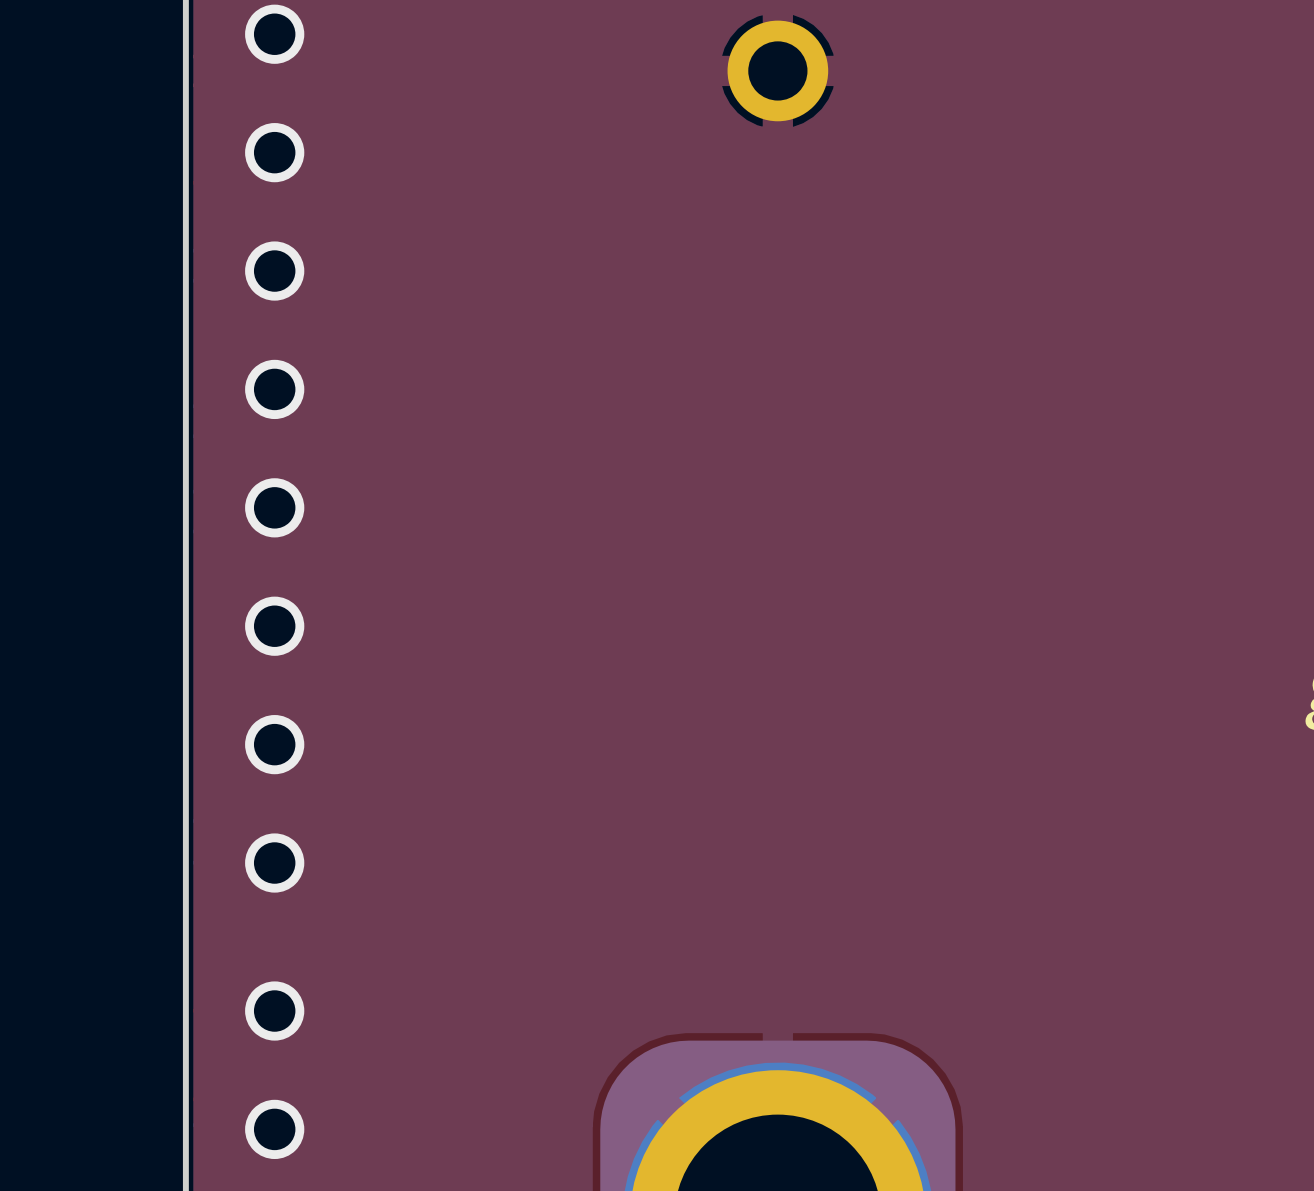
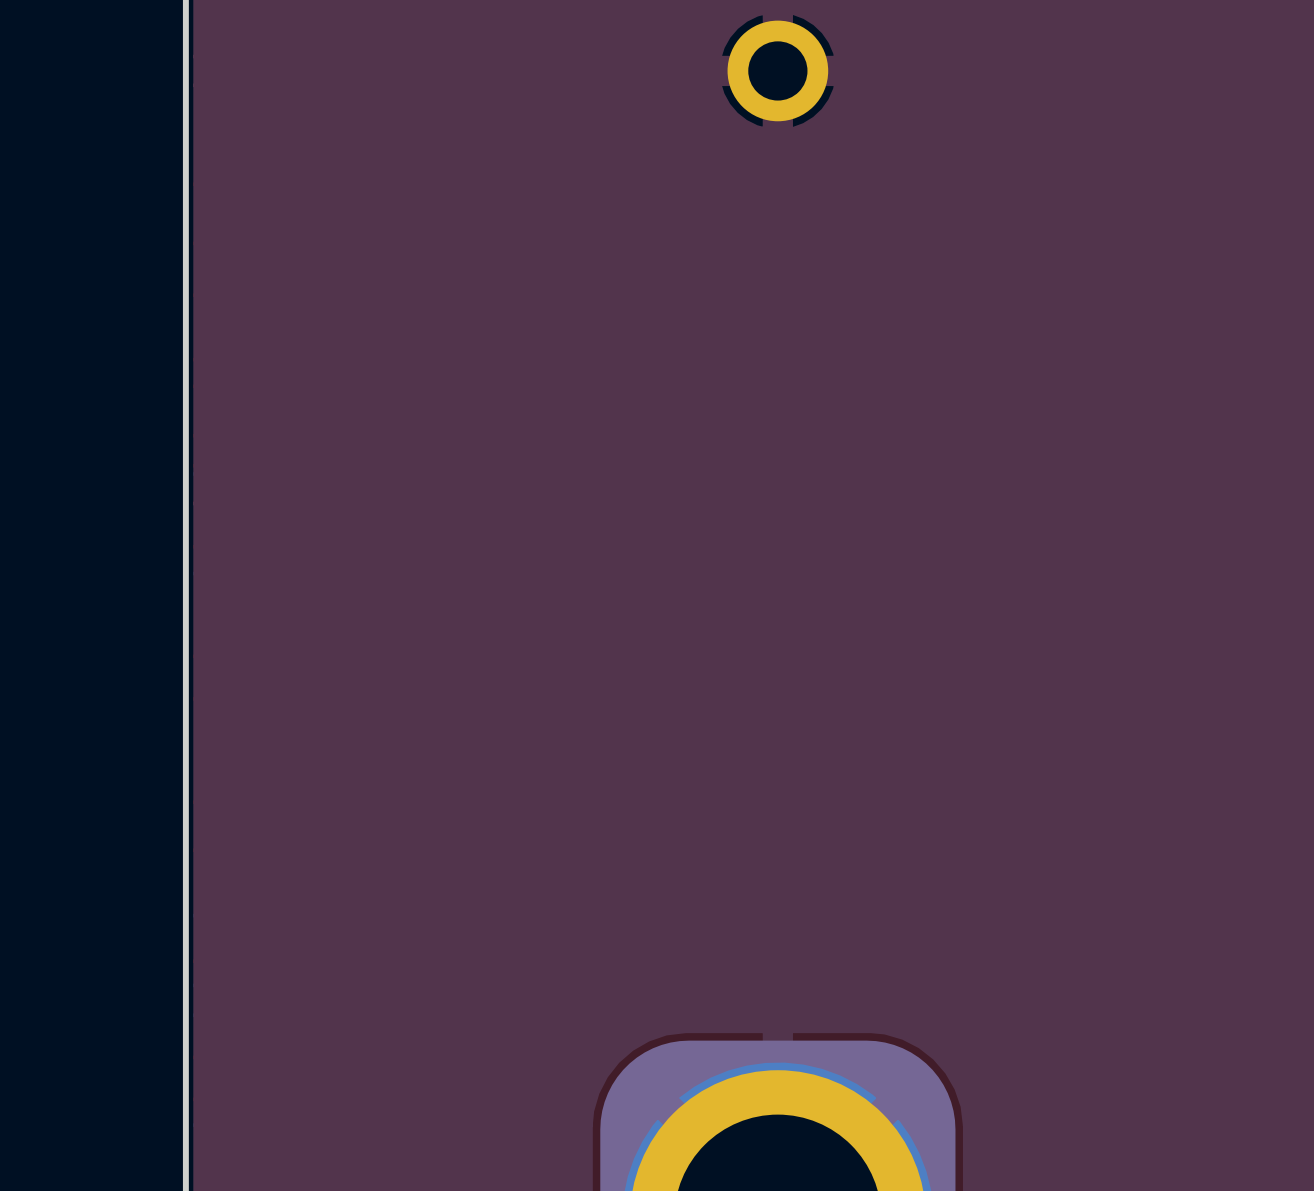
via: (274, 34) -> none
via: (274, 152) -> none
via: (274, 271) -> none
via: (274, 389) -> none
via: (274, 507) -> none
via: (274, 626) -> none
via: (274, 744) -> none
via: (274, 863) -> none
via: (274, 1011) -> none
via: (274, 1129) -> none

